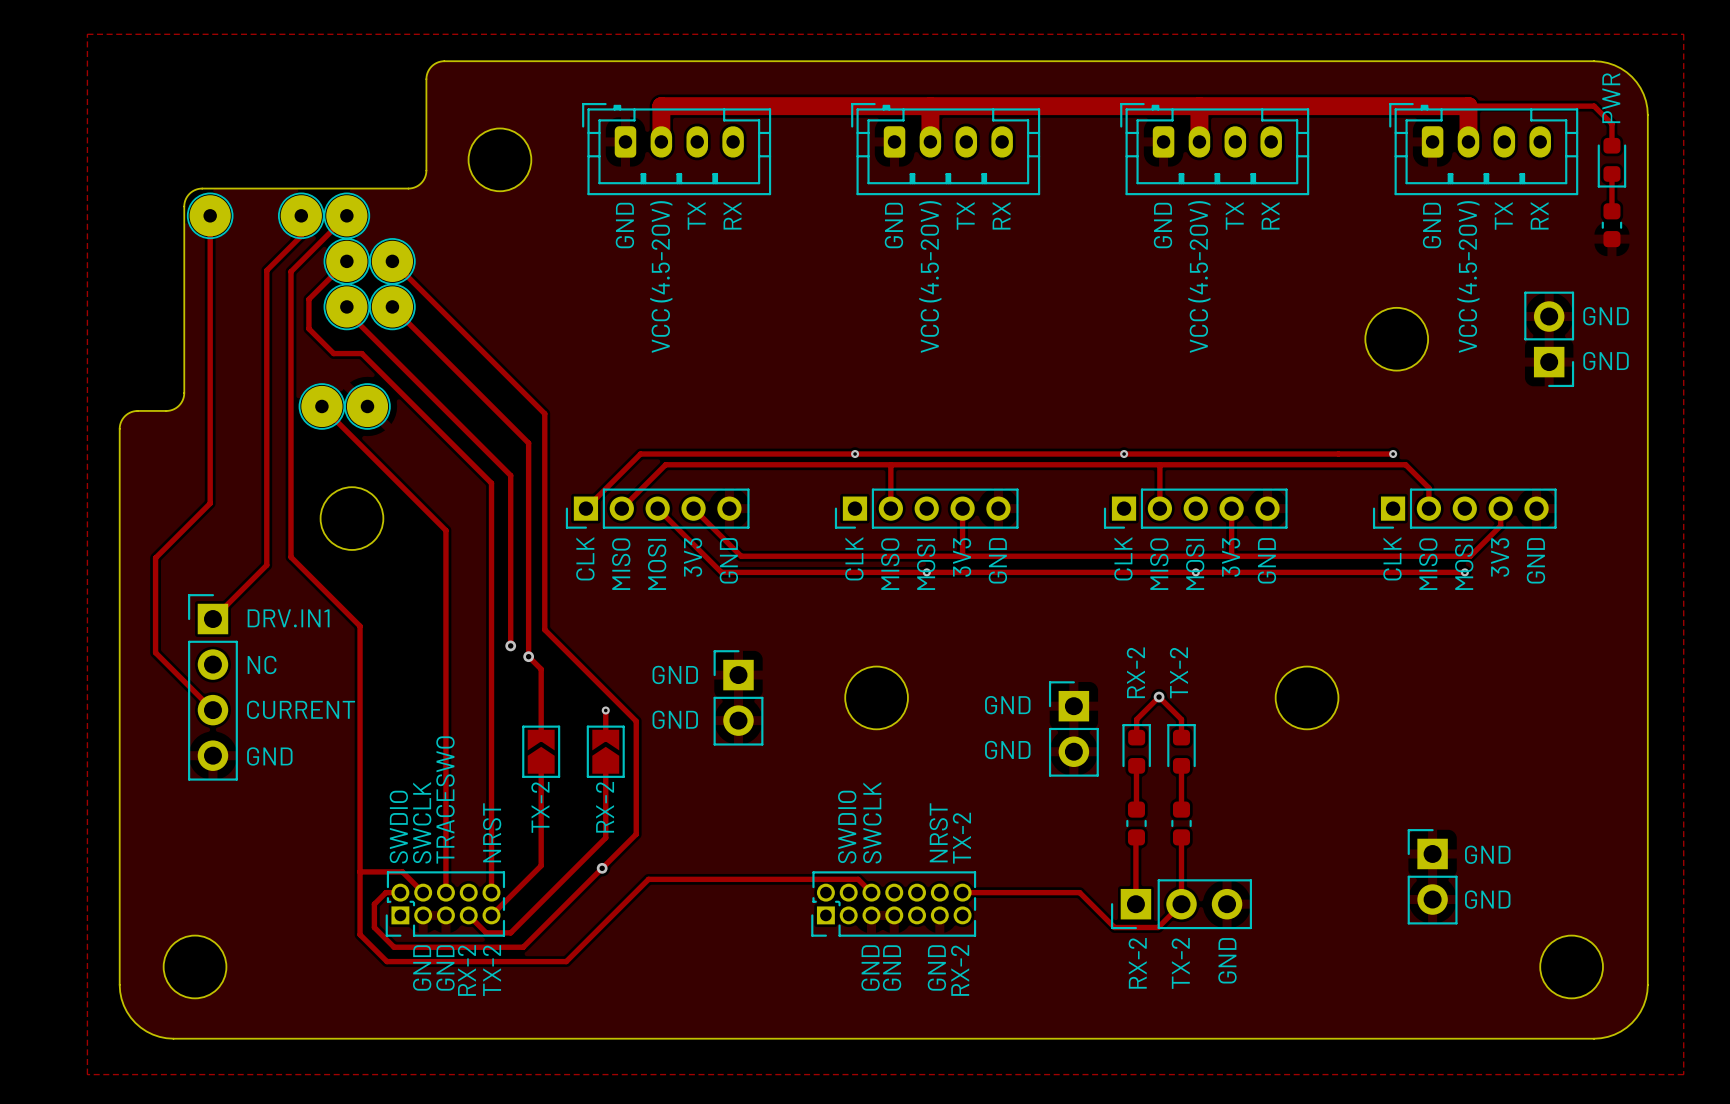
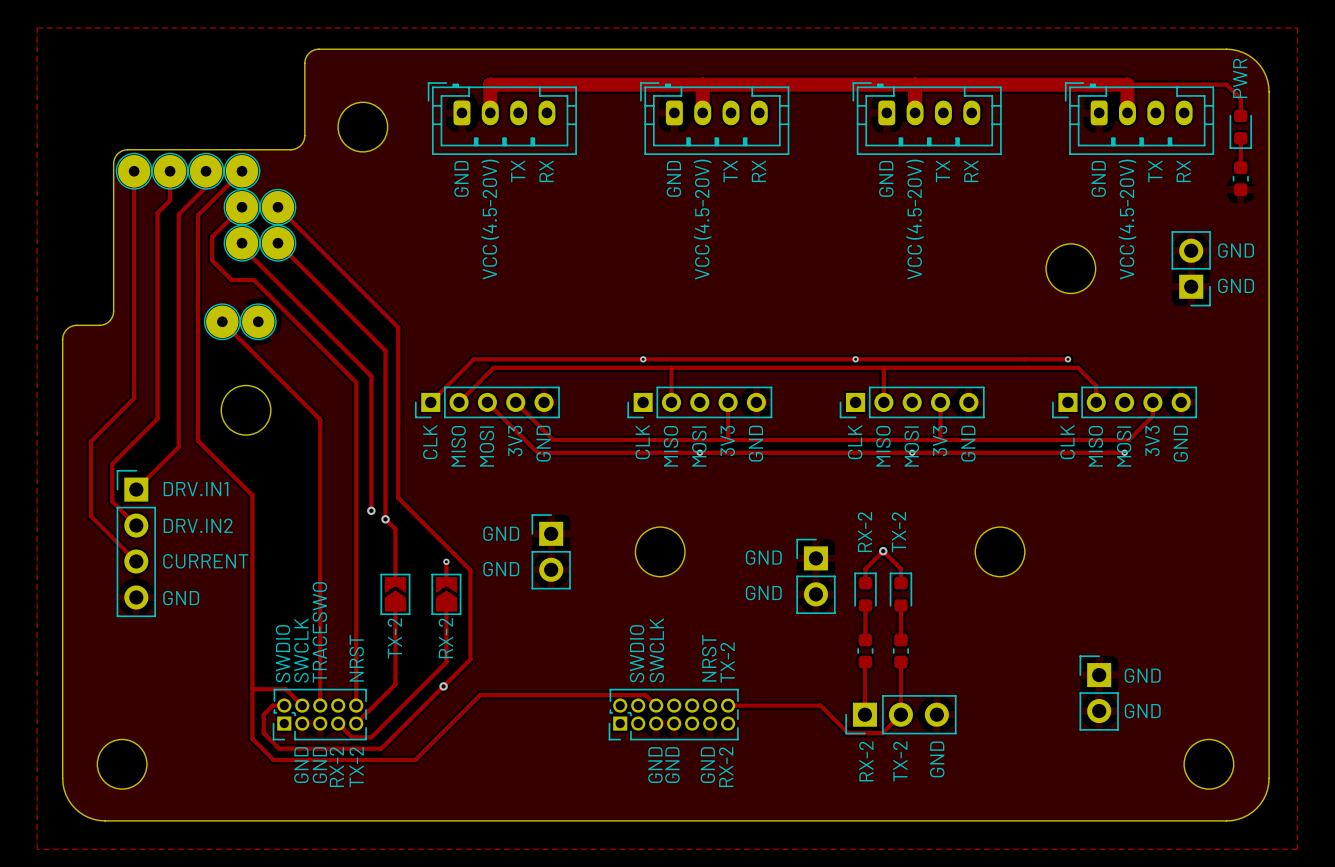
track: none -> (170, 171) (170, 200) (157, 213) (157, 418) (112, 464) (112, 501) (136, 525)
part: none -> (170, 171)
text: NC (262, 664) -> DRV.IN2 (198, 525)

